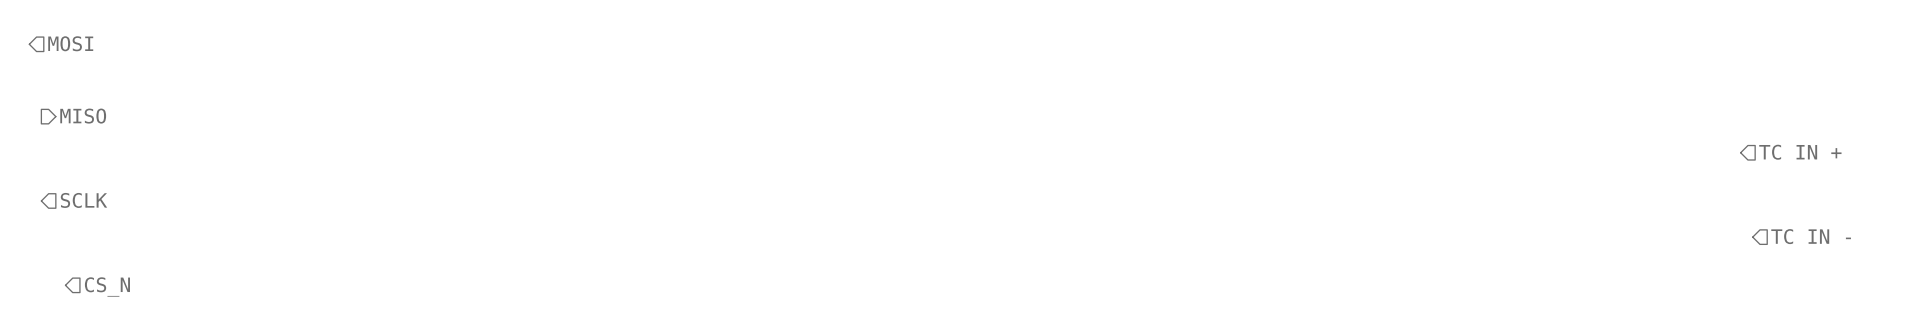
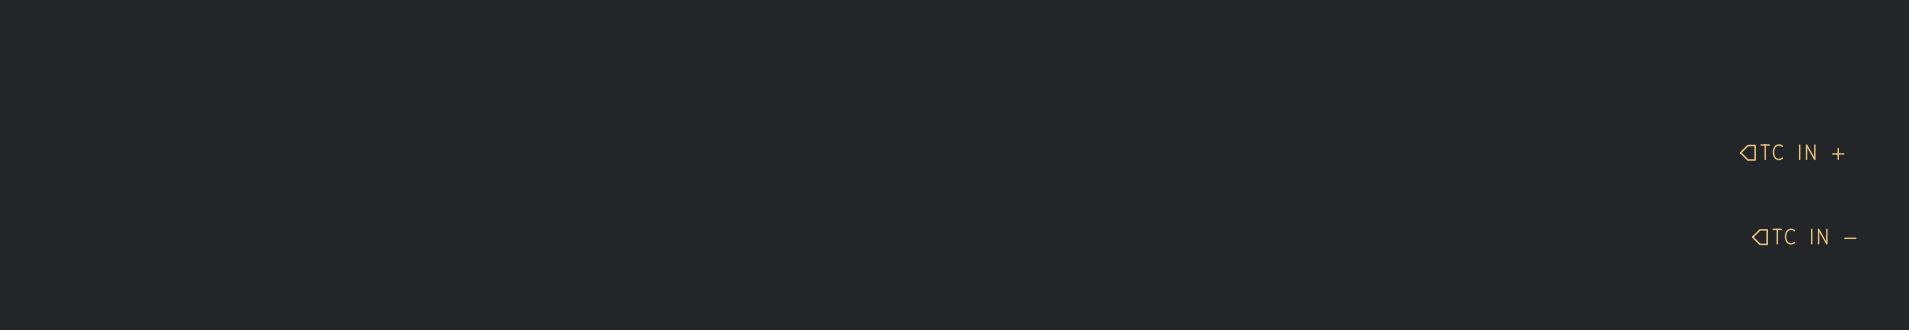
hierarchical label: MOSI (70, 43) -> none
hierarchical label: MISO (83, 116) -> none
hierarchical label: SCLK (83, 200) -> none
hierarchical label: CS_N (107, 287) -> none

